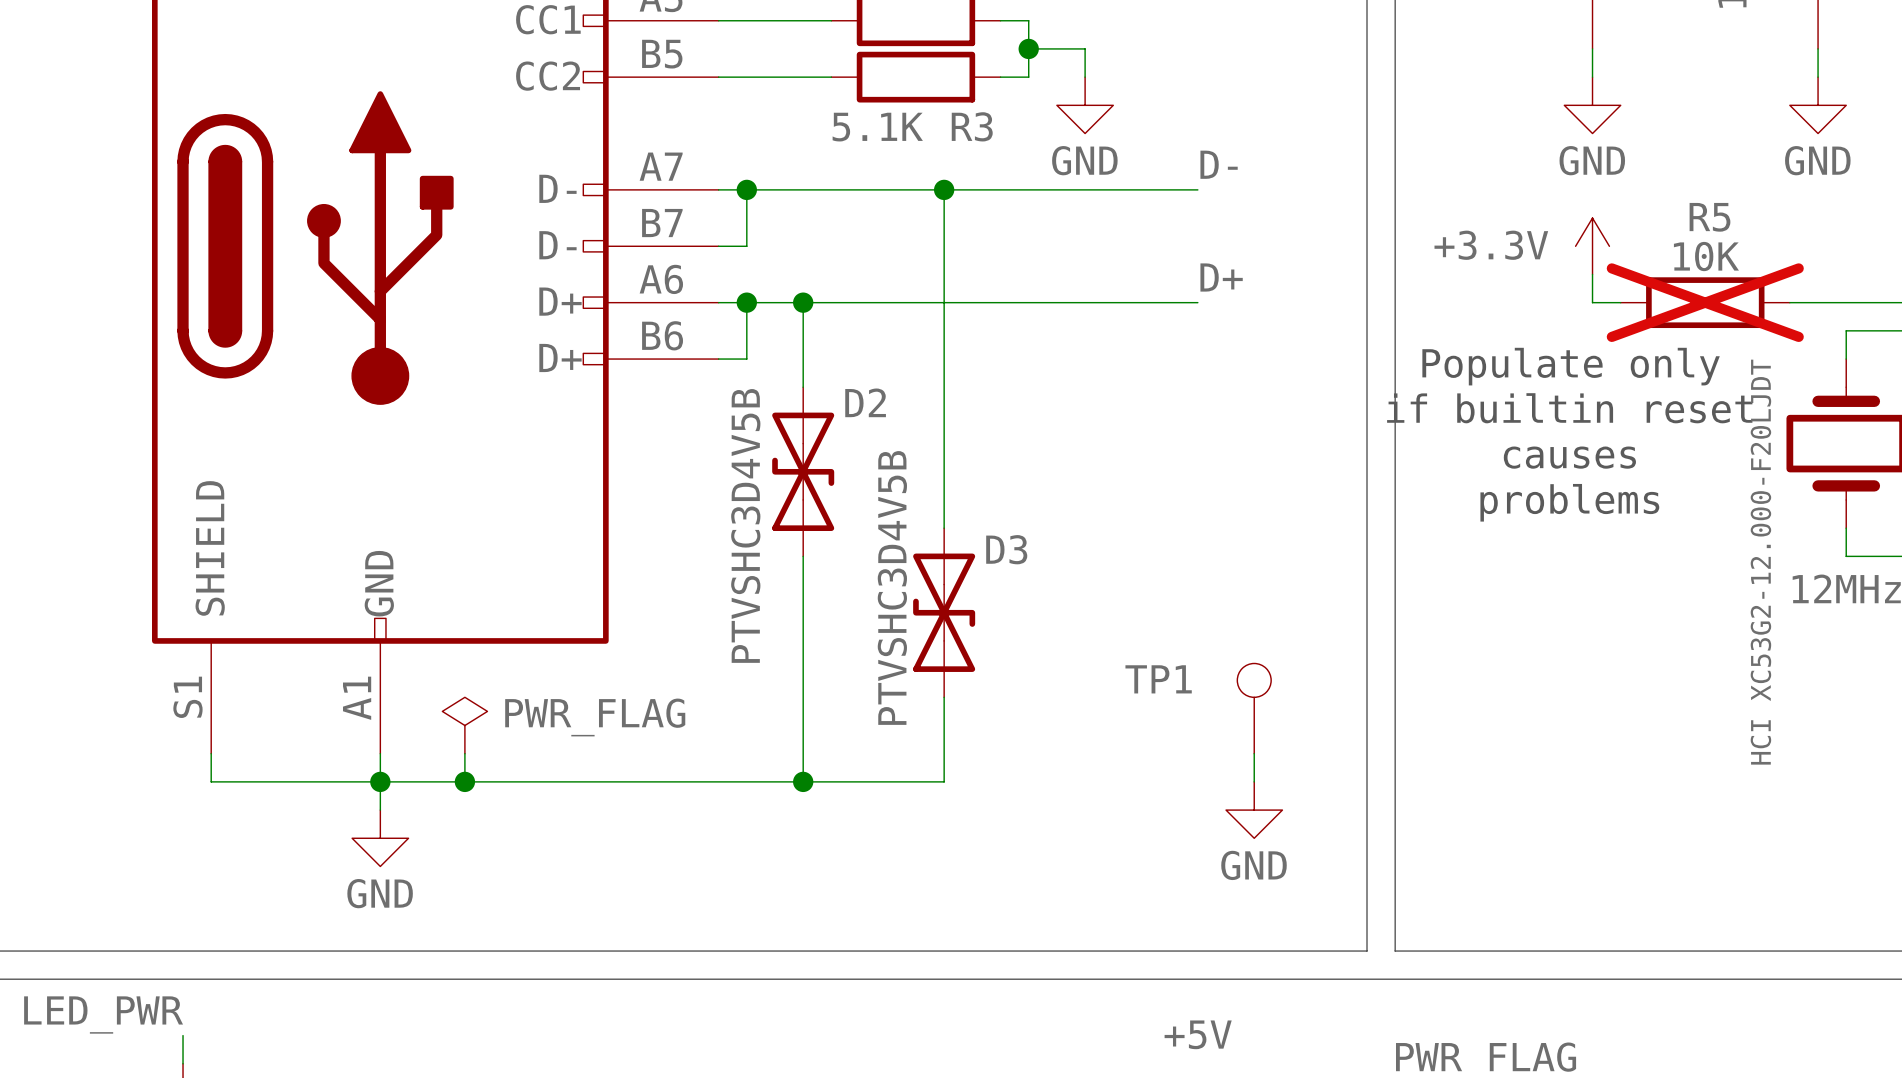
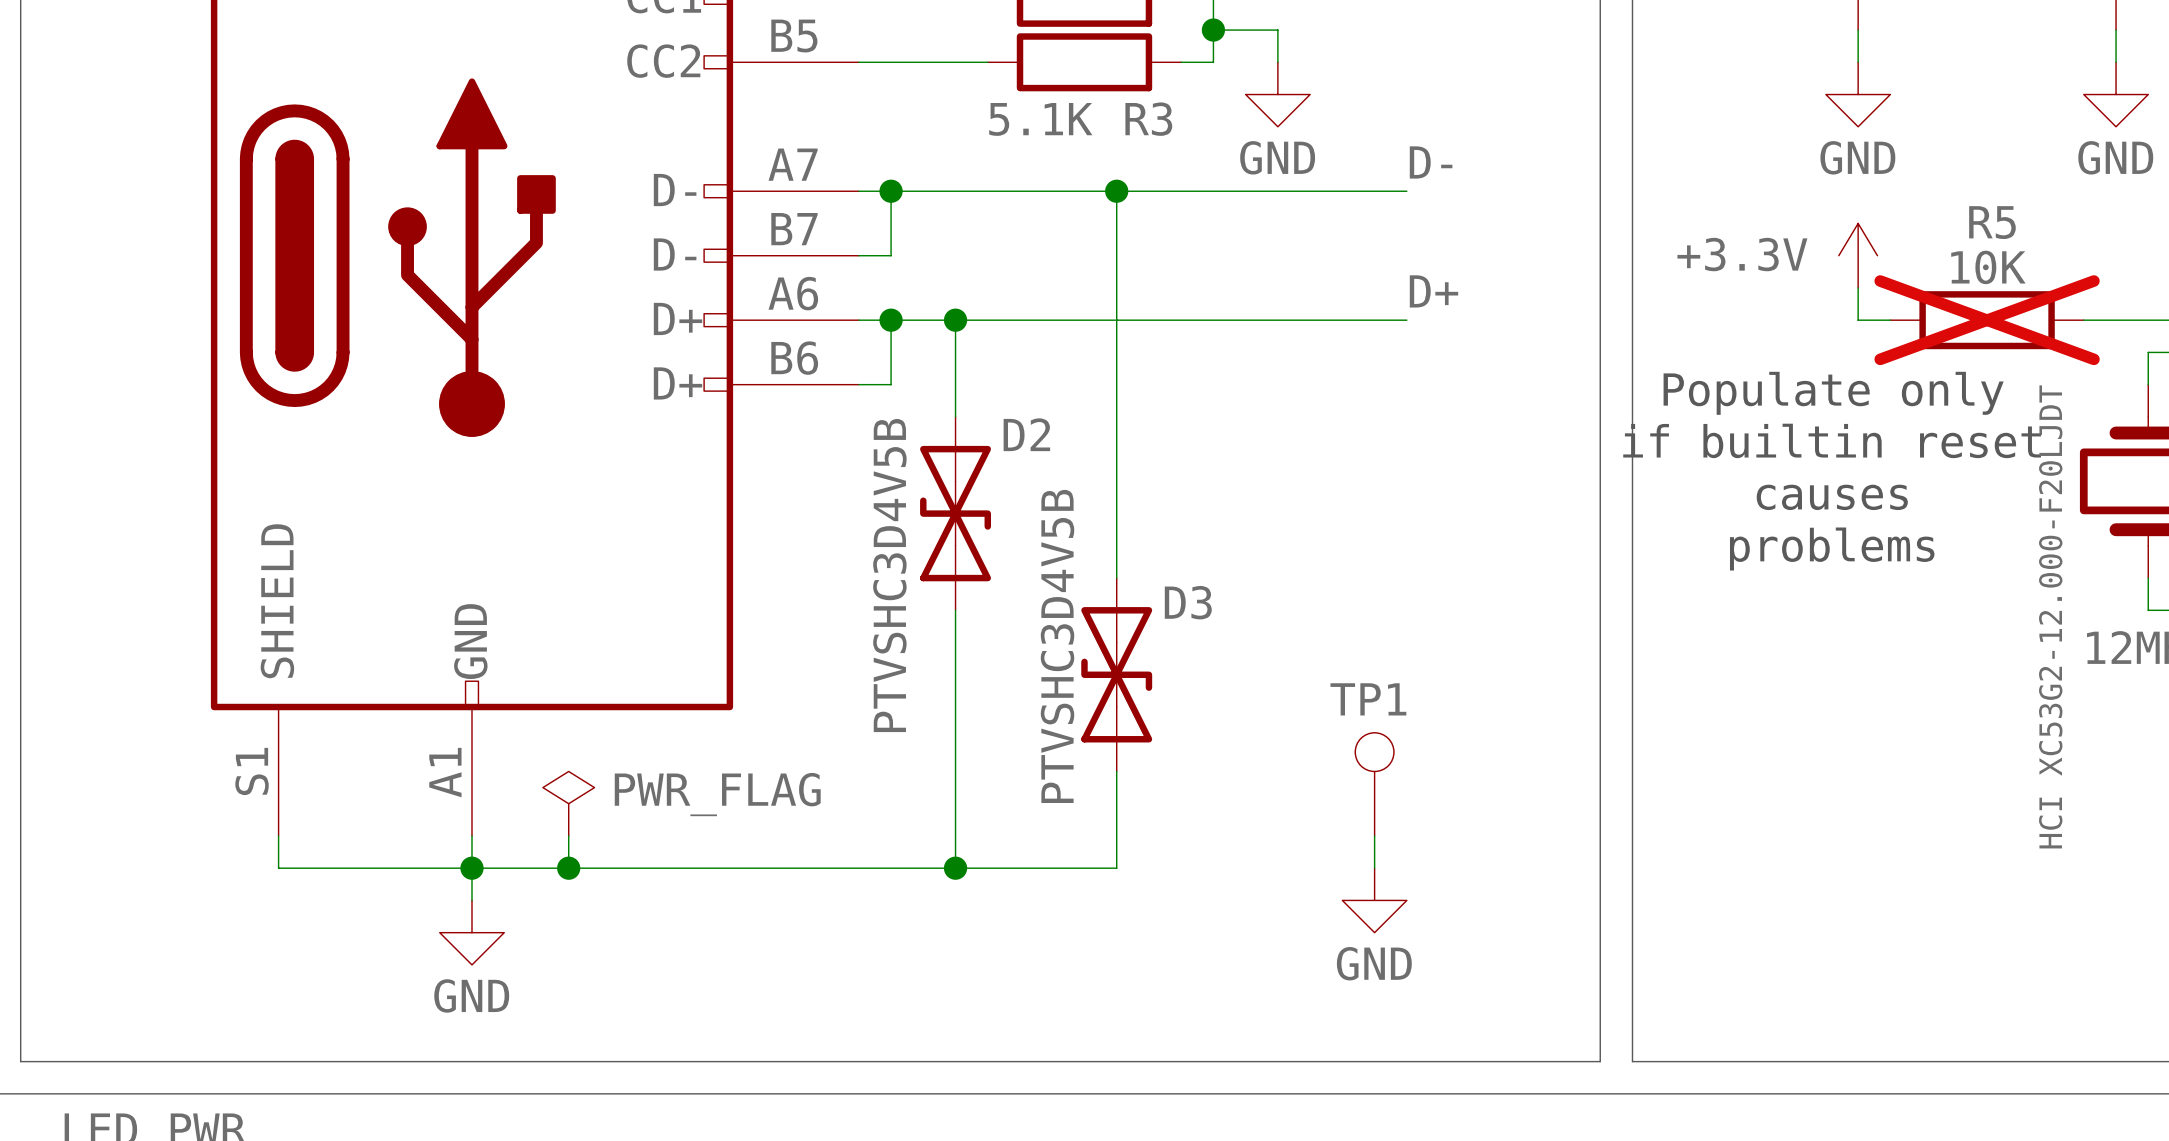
TP1 name position: TP1 (1158, 679) -> TP1 (1368, 699)
TP1 position: (1254, 708) -> (1374, 784)
wire: (1254, 753) (1254, 781) -> (1374, 835) (1374, 868)
power symbol position: GND (1254, 810) -> GND (1374, 900)

